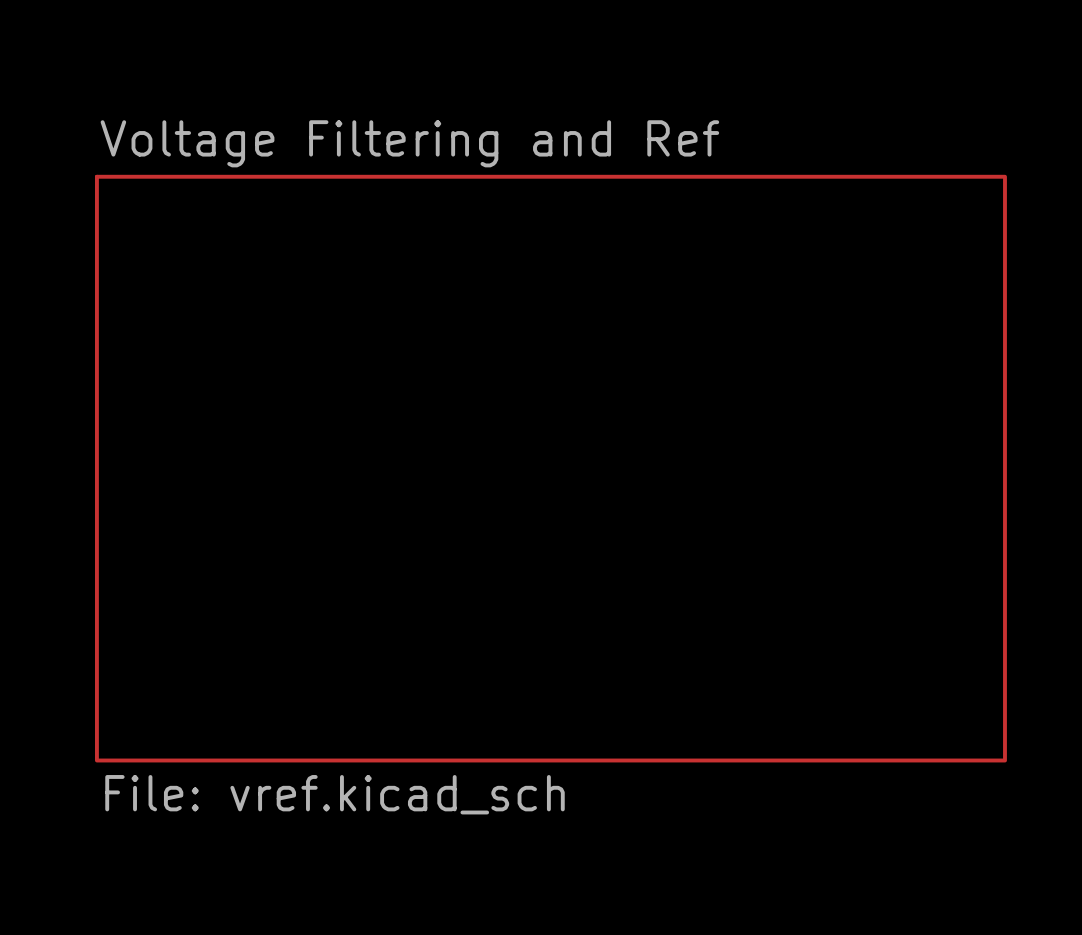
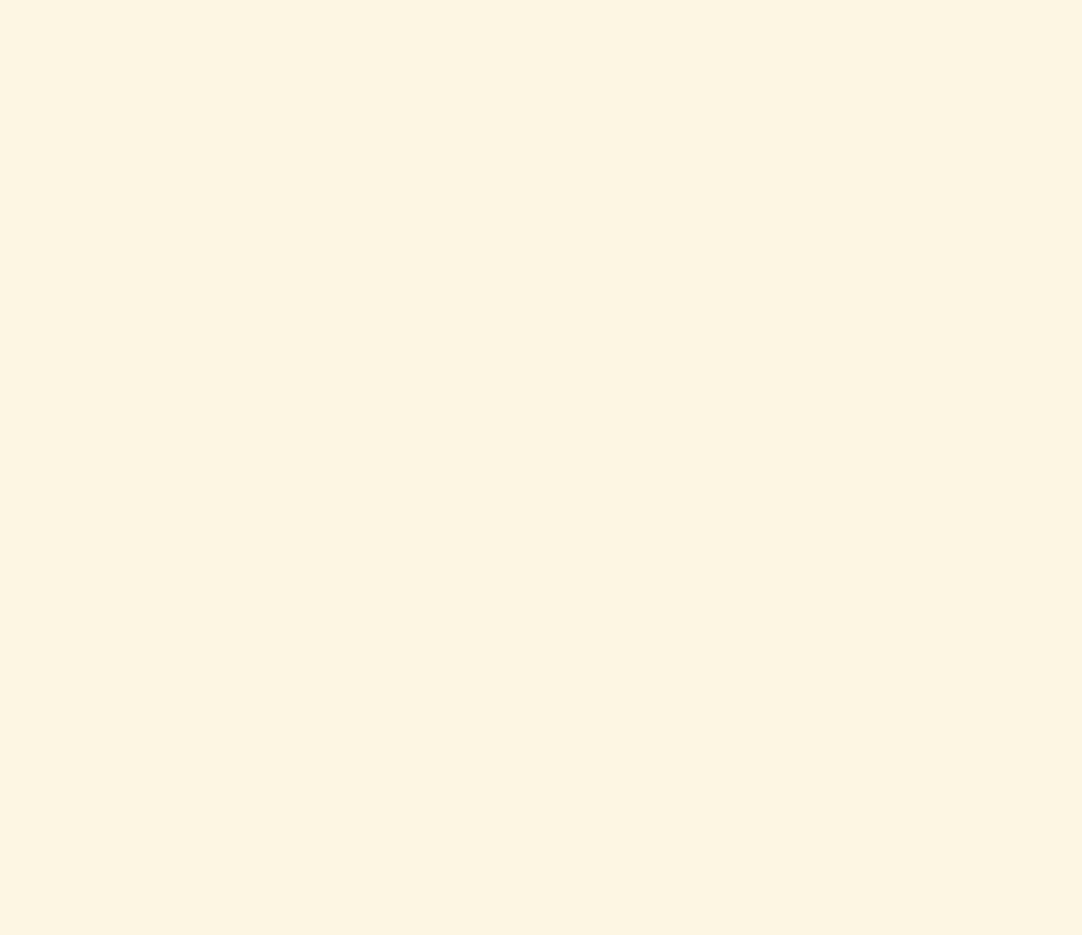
sheet Voltage Filtering and Ref: File: vref.kicad_sch (550, 468) -> none

